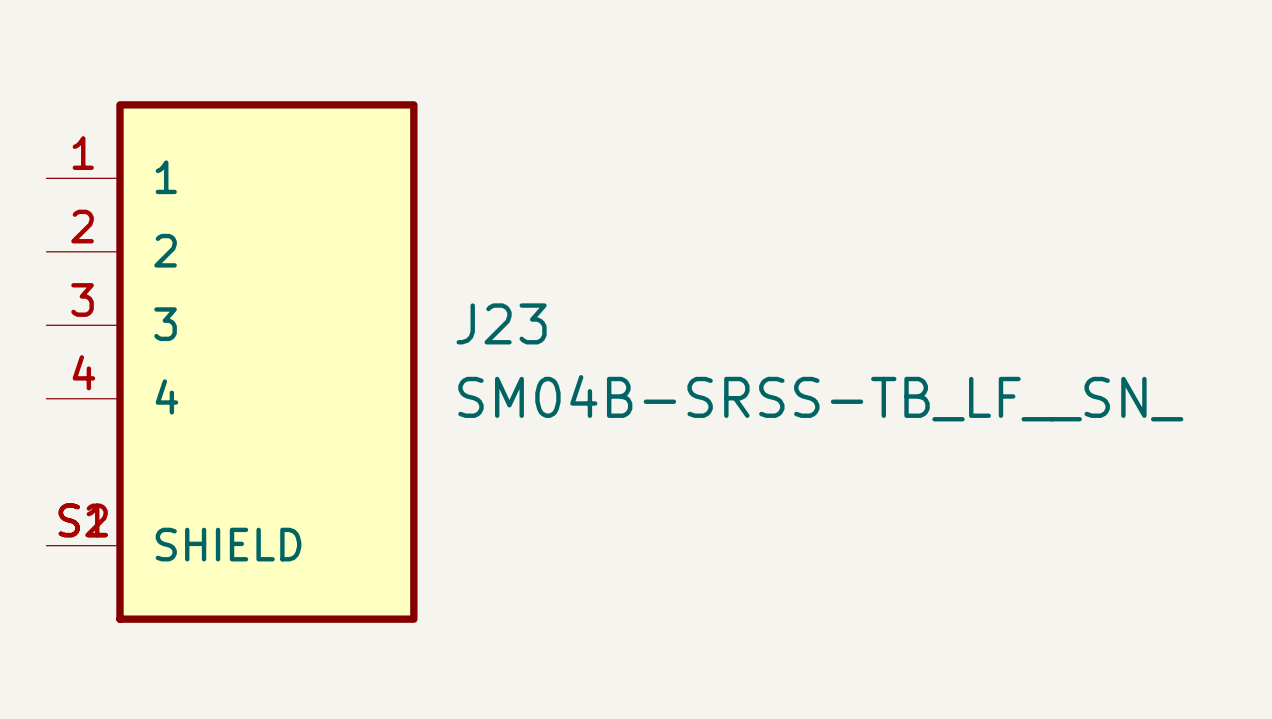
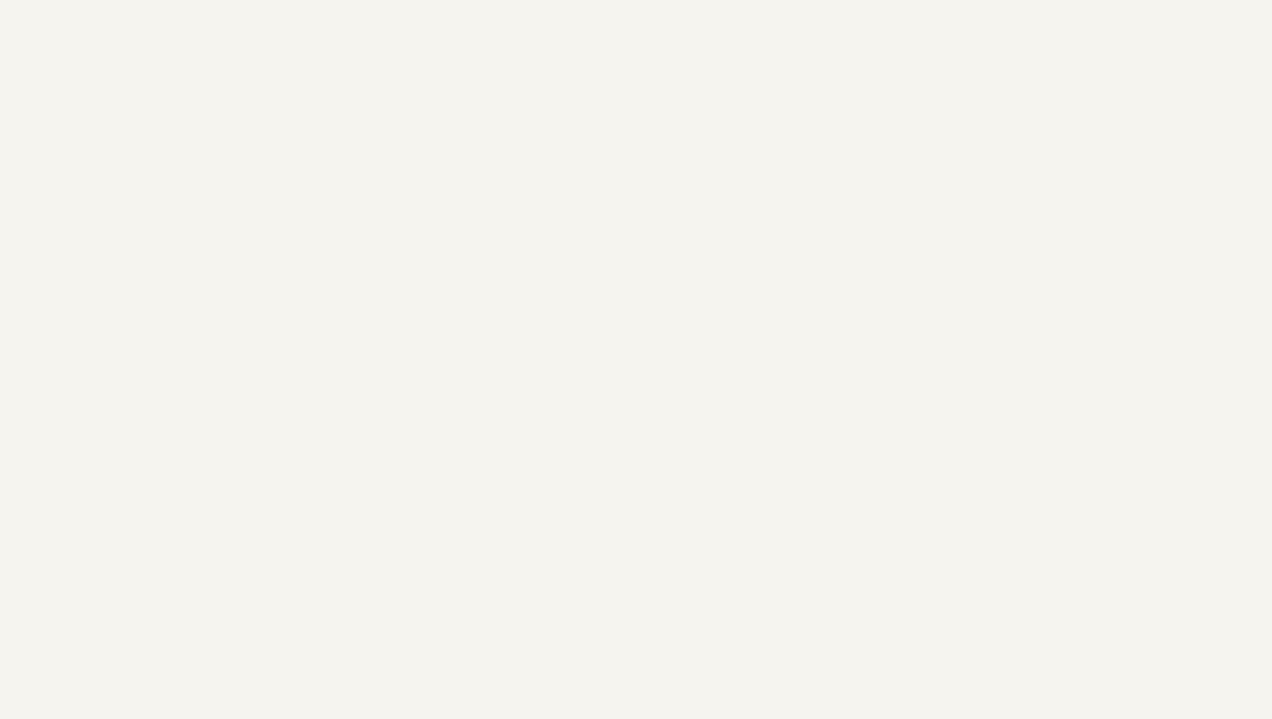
J23: SM04B-SRSS-TB_LF__SN_ (232, 362) -> none

